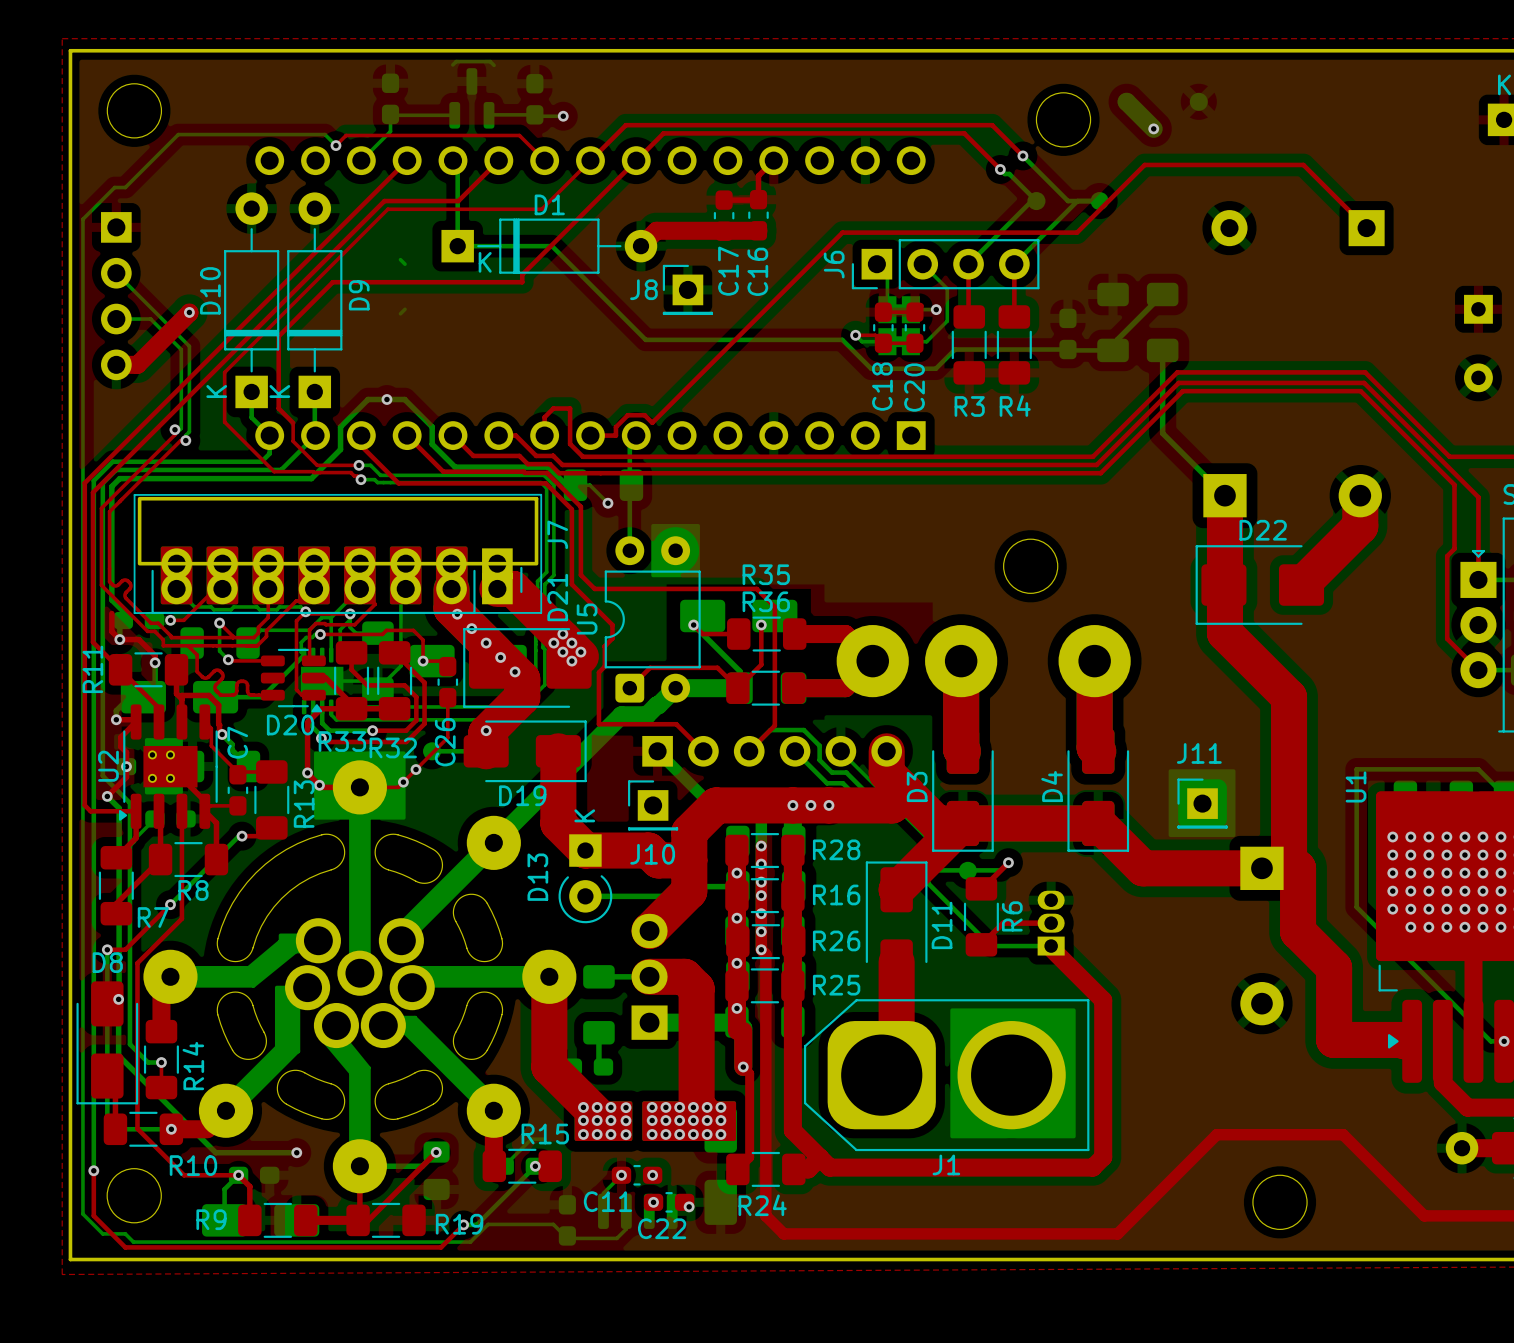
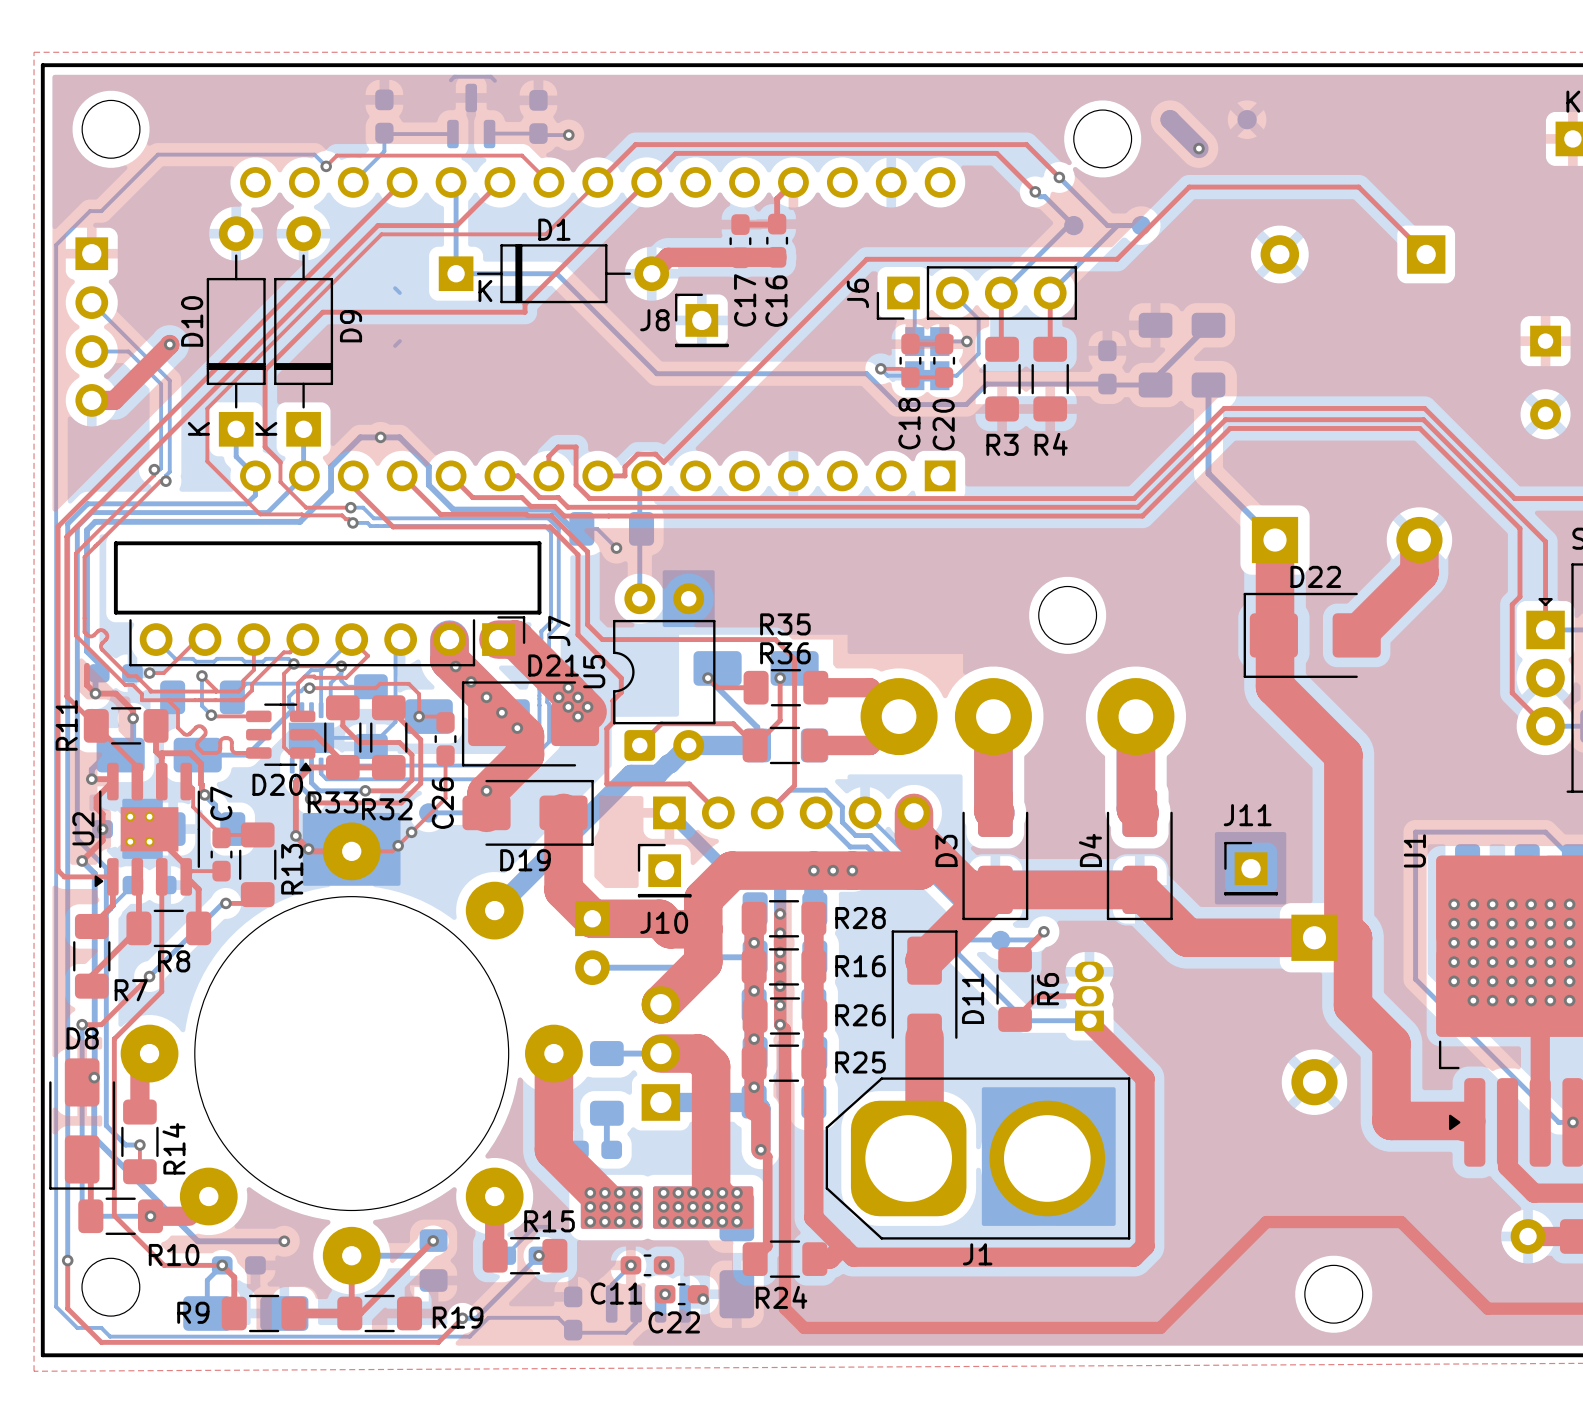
J7 footprint: [133, 493, 543, 615] -> [129, 615, 526, 667]
board edge: none -> (115, 543) (539, 543) (539, 612) (115, 612) (115, 543)
D21 name rotation: 0° (557, 597) -> 90° clockwise (553, 665)
part footprint: [143, 760, 577, 1194] -> [120, 822, 583, 1285]
D13 side: top (585, 878) -> bottom (592, 943)

